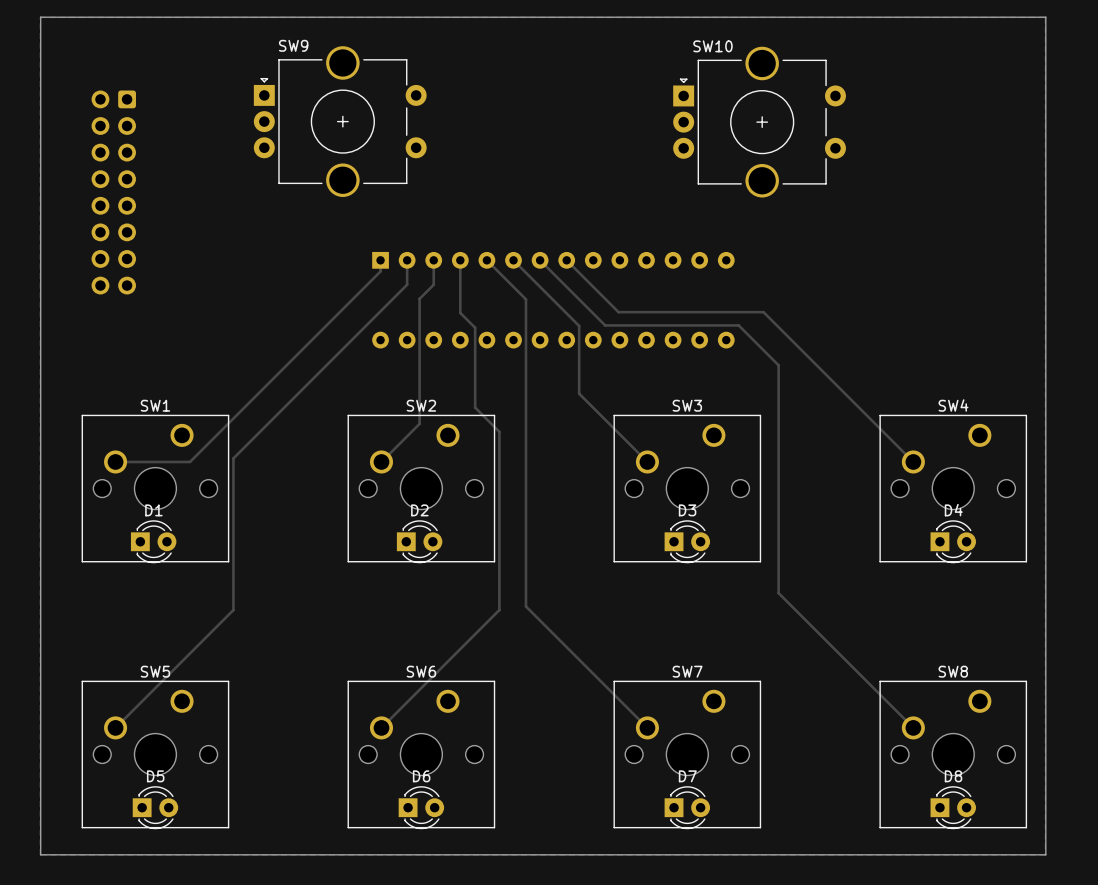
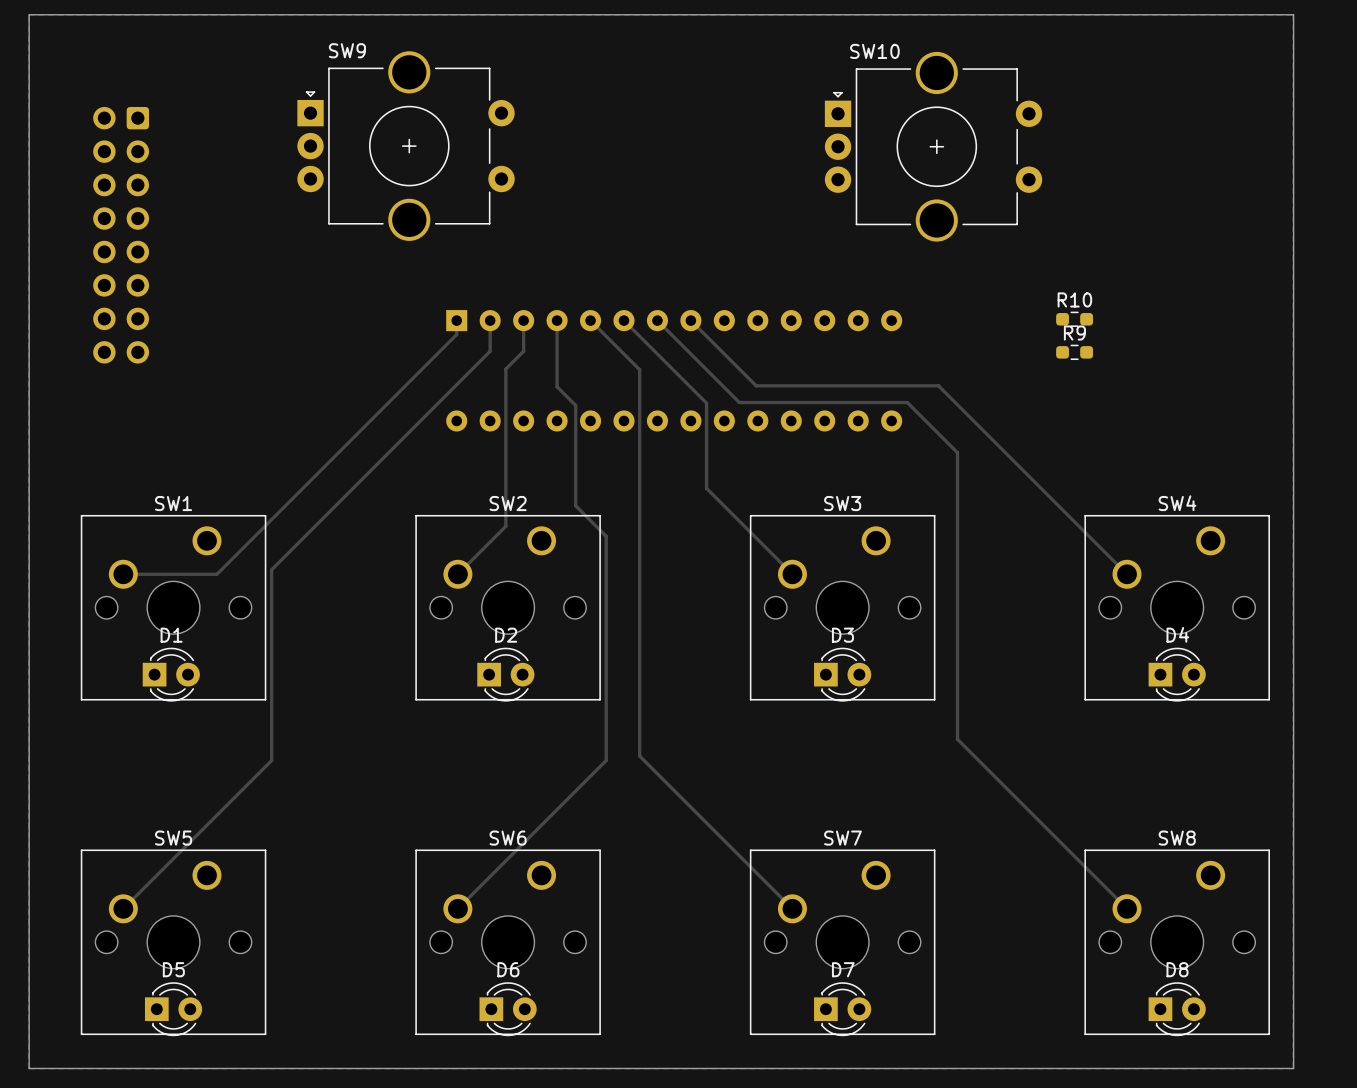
R10: none -> (1074, 319)
R9: none -> (1074, 352)

